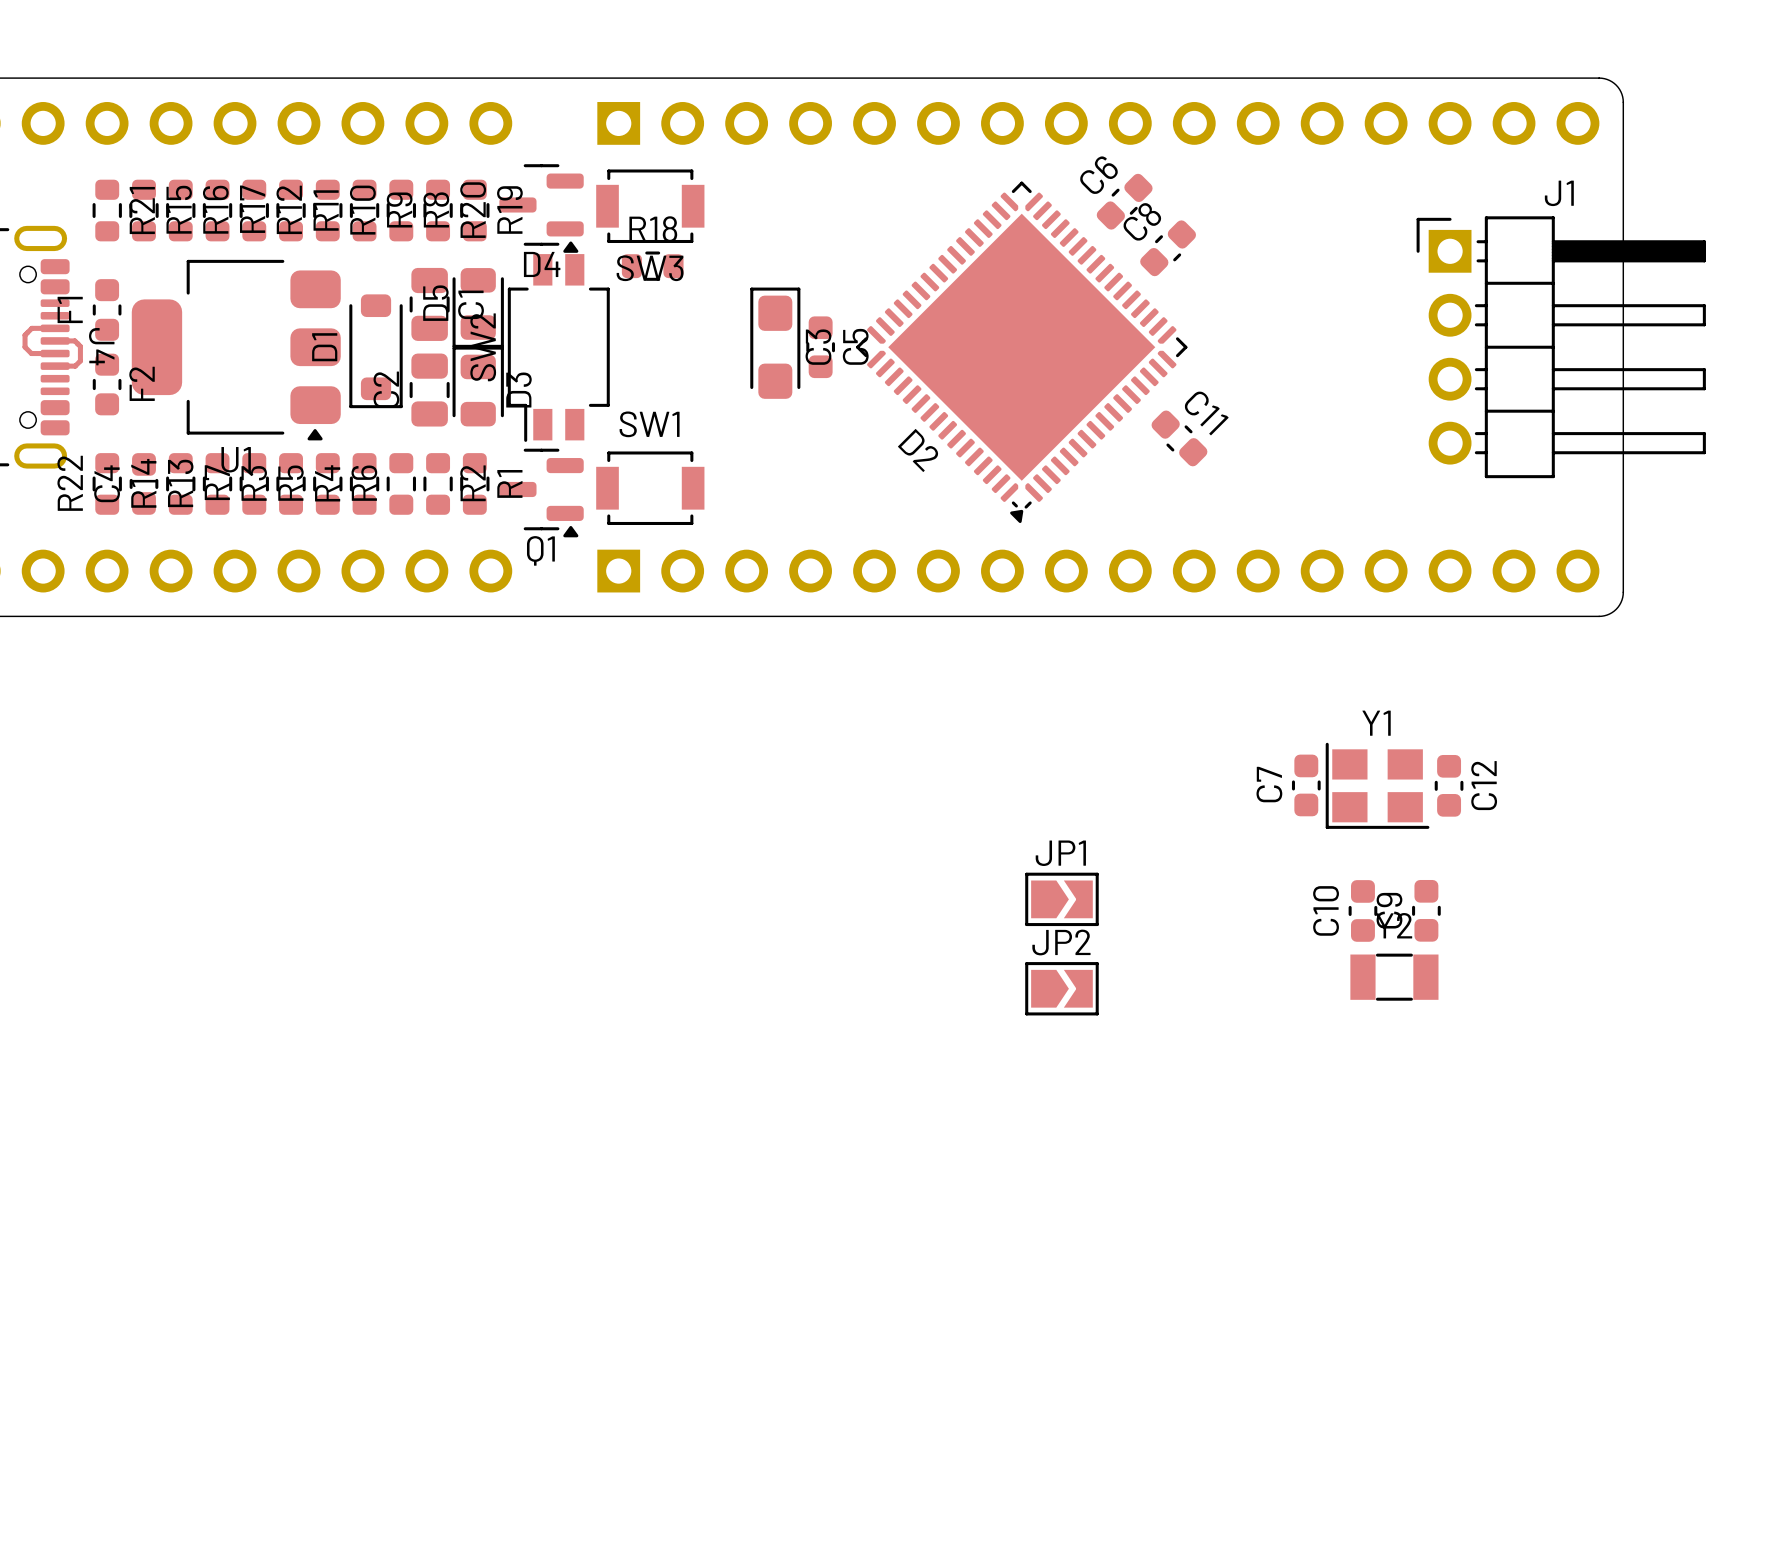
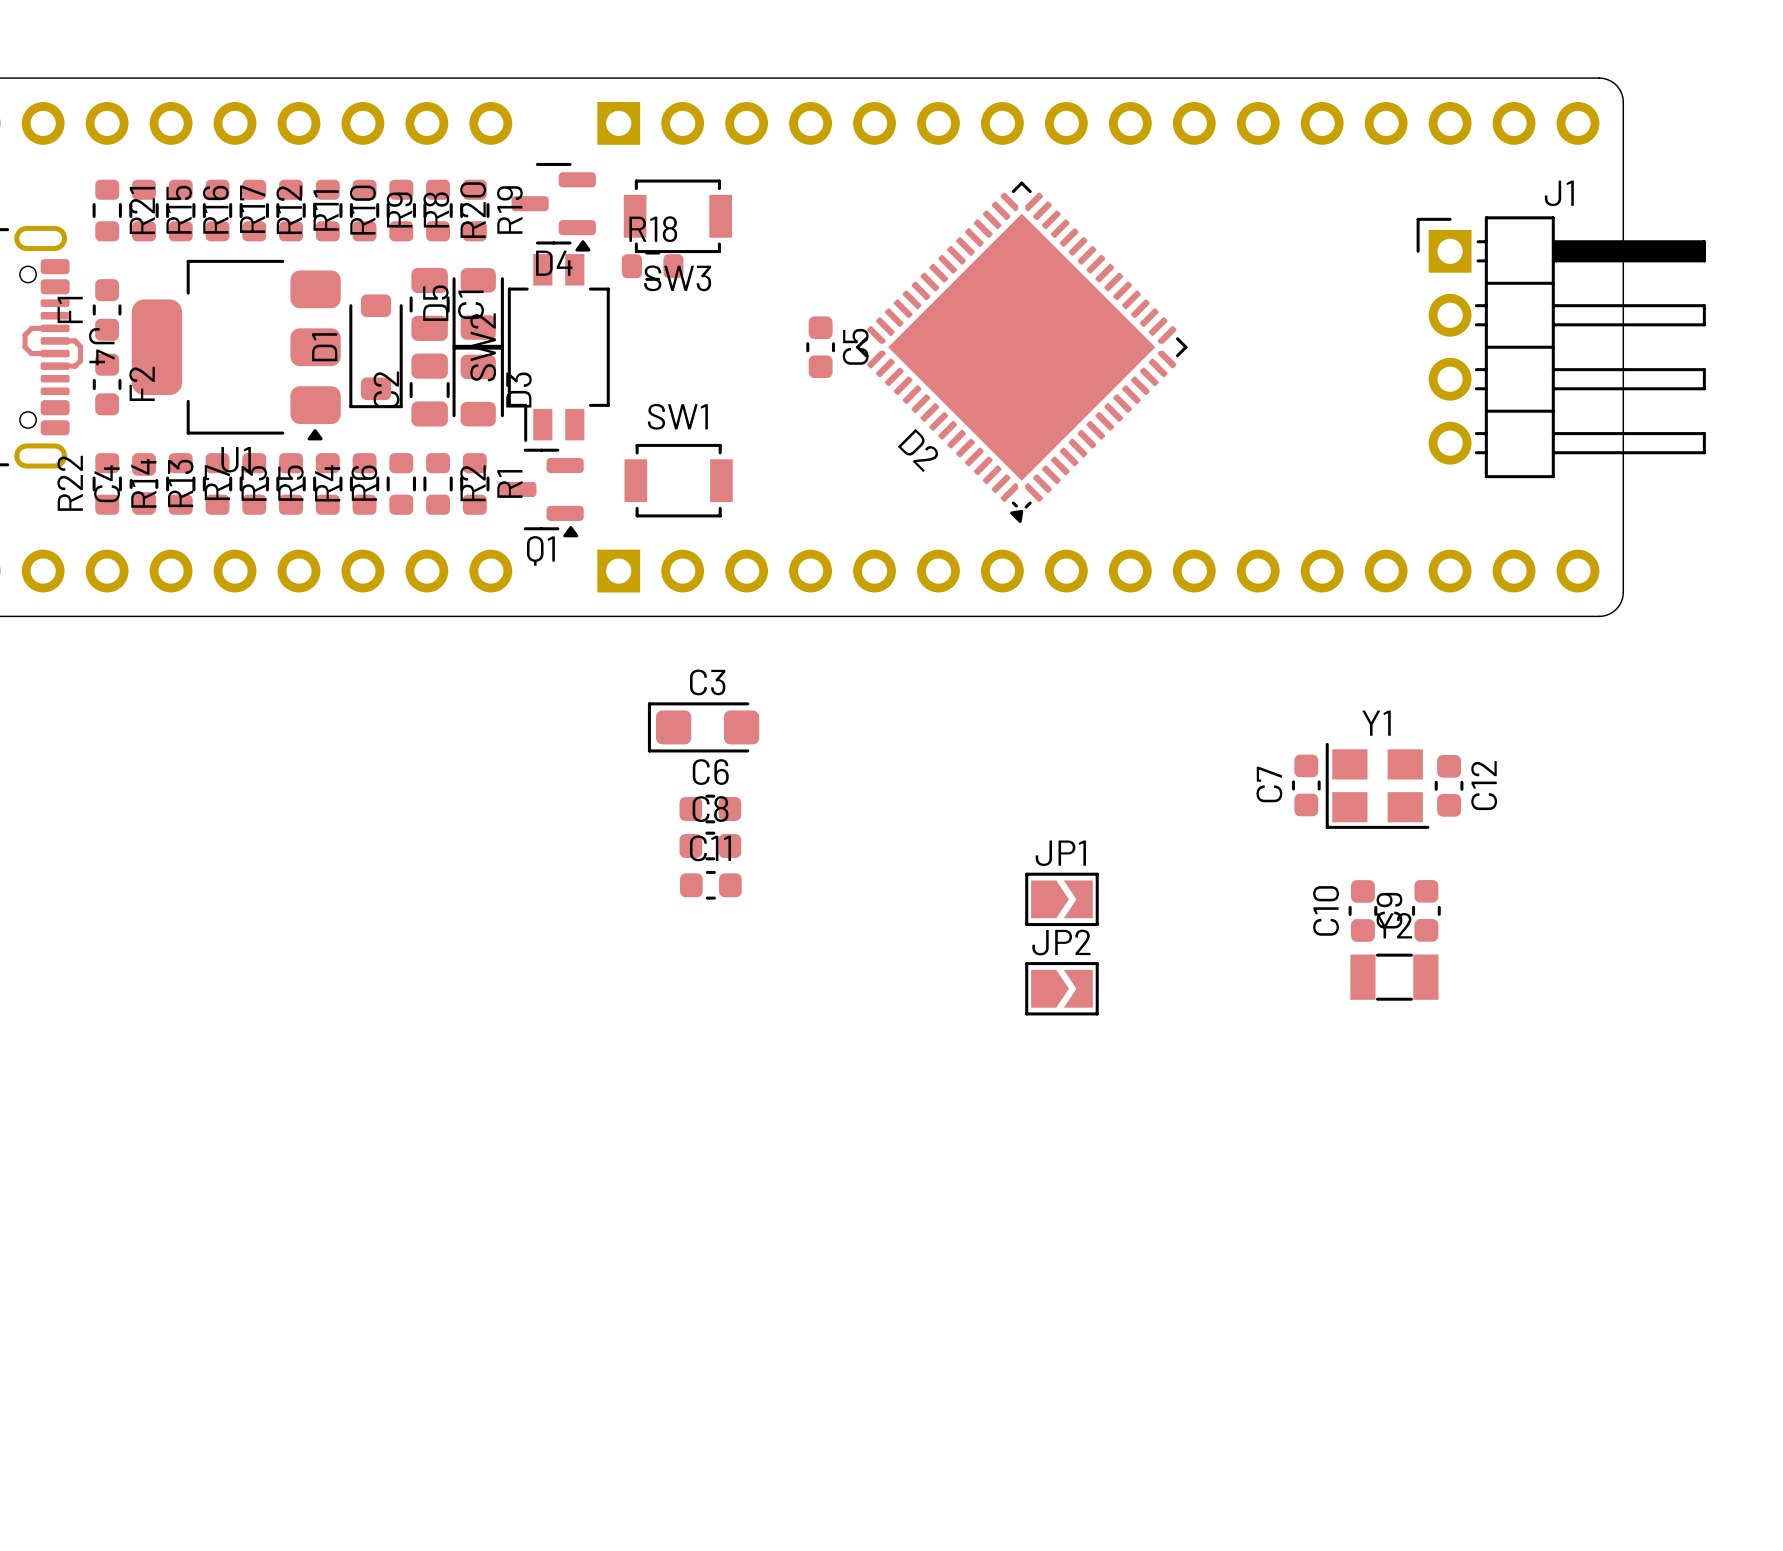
C6 rotation: 0° (1124, 201) -> 45° clockwise (710, 808)
C6 position: (1124, 201) -> (710, 808)
SW3 position: (650, 206) -> (677, 216)
D4 position: (541, 208) -> (553, 207)
C8 rotation: 0° (1168, 248) -> 45° clockwise (710, 846)
C8 position: (1168, 248) -> (710, 846)
C3 rotation: 0° (775, 343) -> 90° counterclockwise (703, 727)
C3 position: (775, 343) -> (703, 727)
C11 rotation: 0° (1179, 438) -> 45° counterclockwise (710, 885)
C11 position: (1179, 438) -> (710, 885)
SW1 position: (650, 488) -> (678, 480)

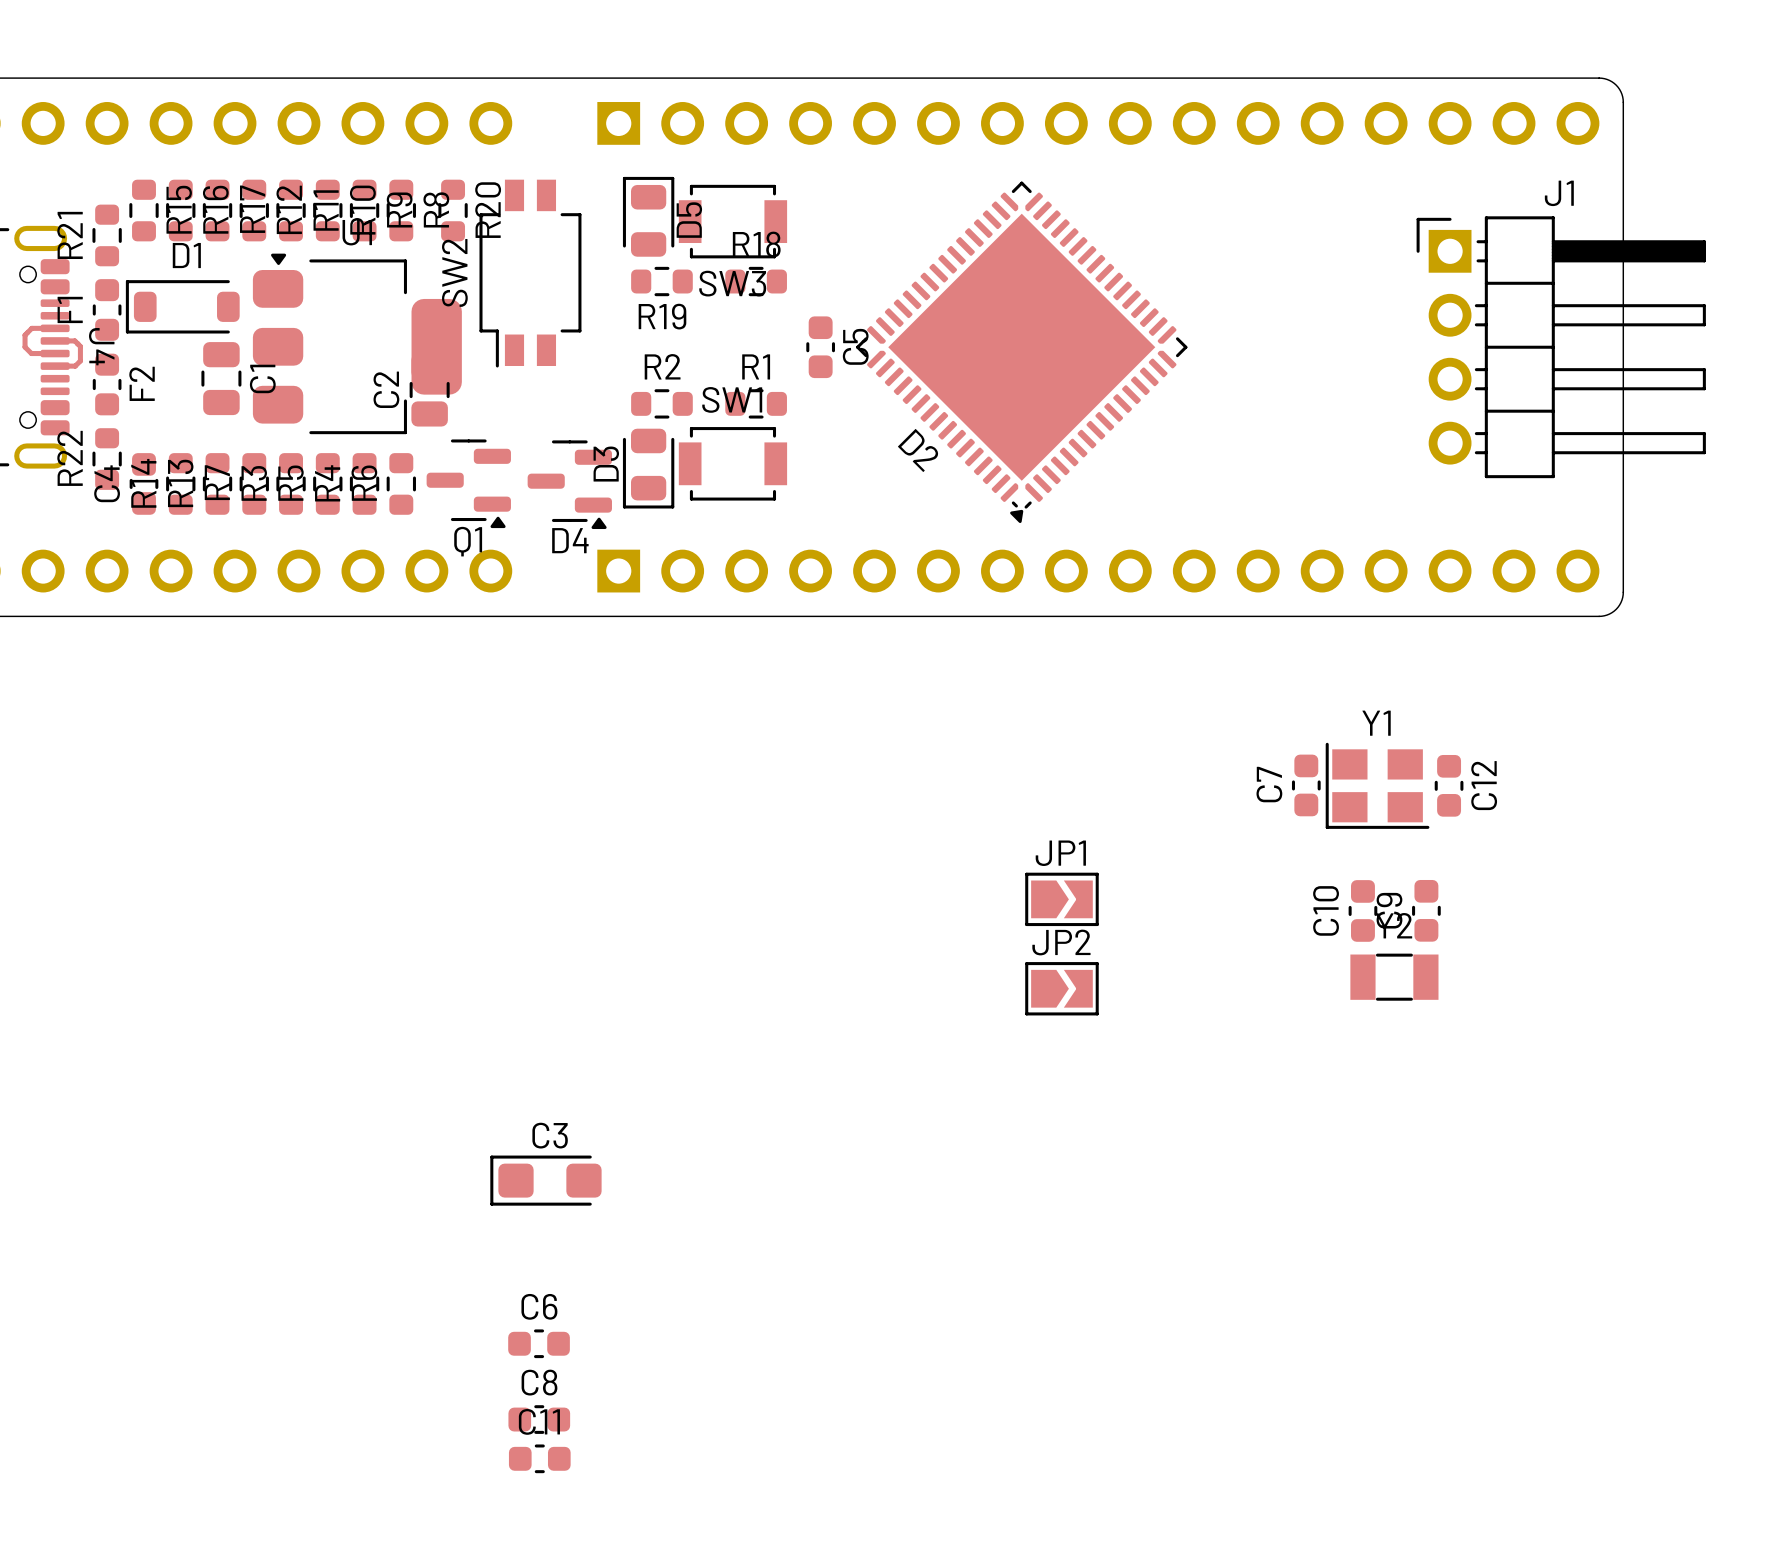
D4 position: (553, 207) -> (569, 484)
R21 position: (107, 210) -> (107, 235)
R21 name position: R21 (142, 210) -> R21 (70, 235)
R20 position: (438, 210) -> (453, 210)
R19 rotation: 0° (474, 210) -> 90° clockwise (661, 281)
R19 position: (474, 210) -> (661, 281)
SW3 position: (677, 216) -> (732, 221)
R18 position: (652, 266) -> (756, 281)
C1 position: (429, 304) -> (221, 378)
D5 rotation: 0° (478, 307) -> 180° (648, 216)
D5 position: (478, 307) -> (648, 216)
SW2 position: (558, 347) -> (530, 273)
U1 rotation: 0° (236, 350) -> 180° (357, 343)
D1 rotation: 0° (376, 351) -> 90° clockwise (182, 306)
D1 position: (376, 351) -> (182, 306)
D3 rotation: 0° (478, 386) -> 180° (648, 468)
D3 position: (478, 386) -> (648, 468)
SW1 position: (678, 480) -> (732, 463)
R22 position: (107, 483) -> (107, 459)
R2 rotation: 0° (438, 483) -> 90° clockwise (661, 403)
R2 position: (438, 483) -> (661, 403)
R2 name position: R2 (472, 483) -> R2 (662, 366)
R1 rotation: 0° (474, 483) -> 90° clockwise (756, 403)
R1 position: (474, 483) -> (756, 403)
R1 name position: R1 (509, 483) -> R1 (756, 366)
Q1 position: (541, 493) -> (468, 483)
C3 position: (703, 727) -> (545, 1180)
C6 position: (710, 808) -> (539, 1343)
C8 position: (710, 846) -> (539, 1419)
C11 position: (710, 885) -> (539, 1458)

